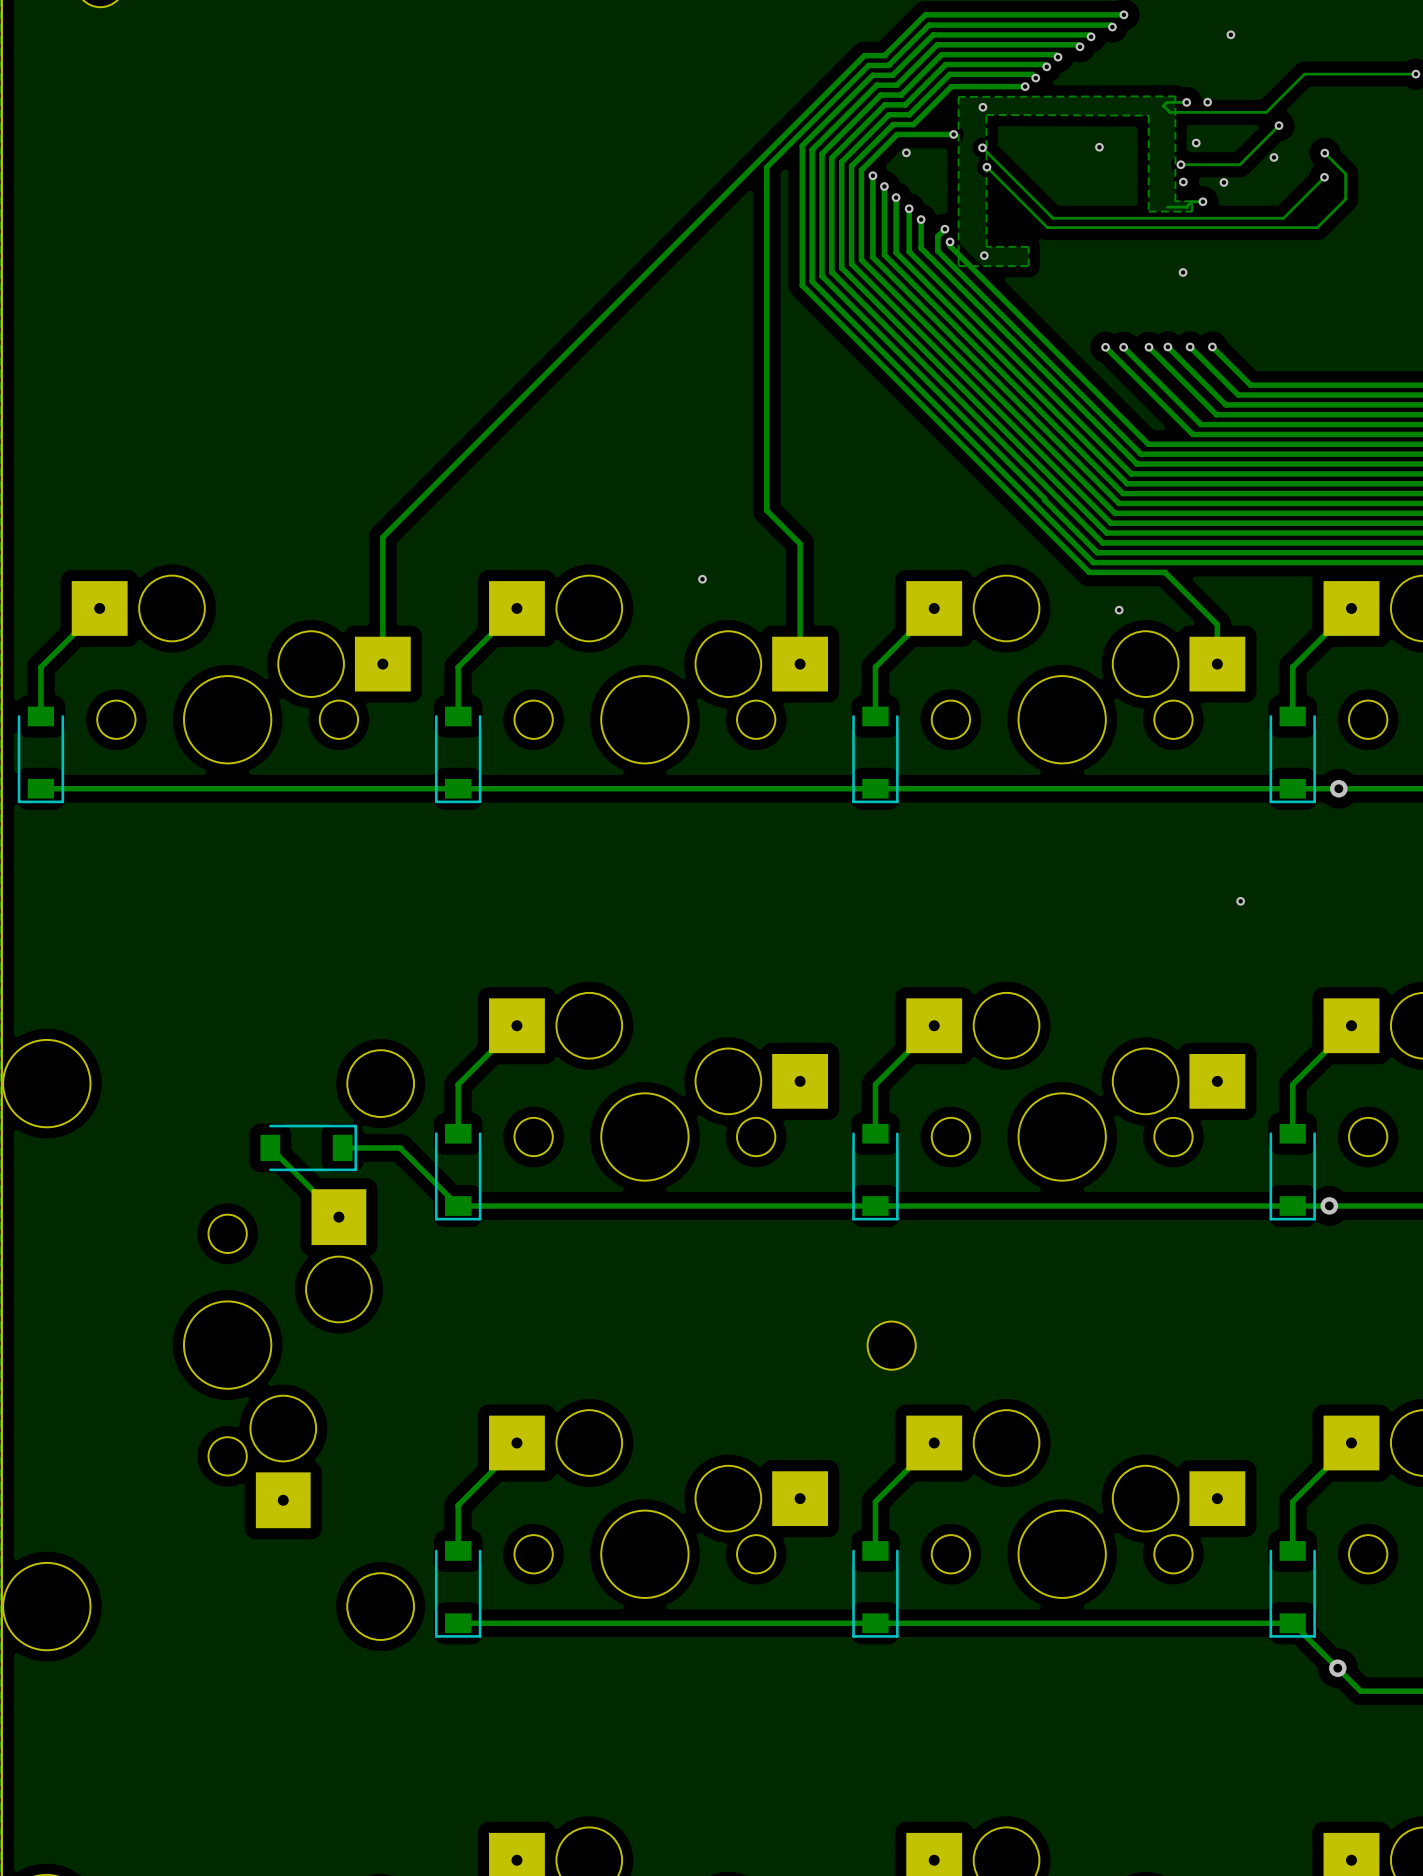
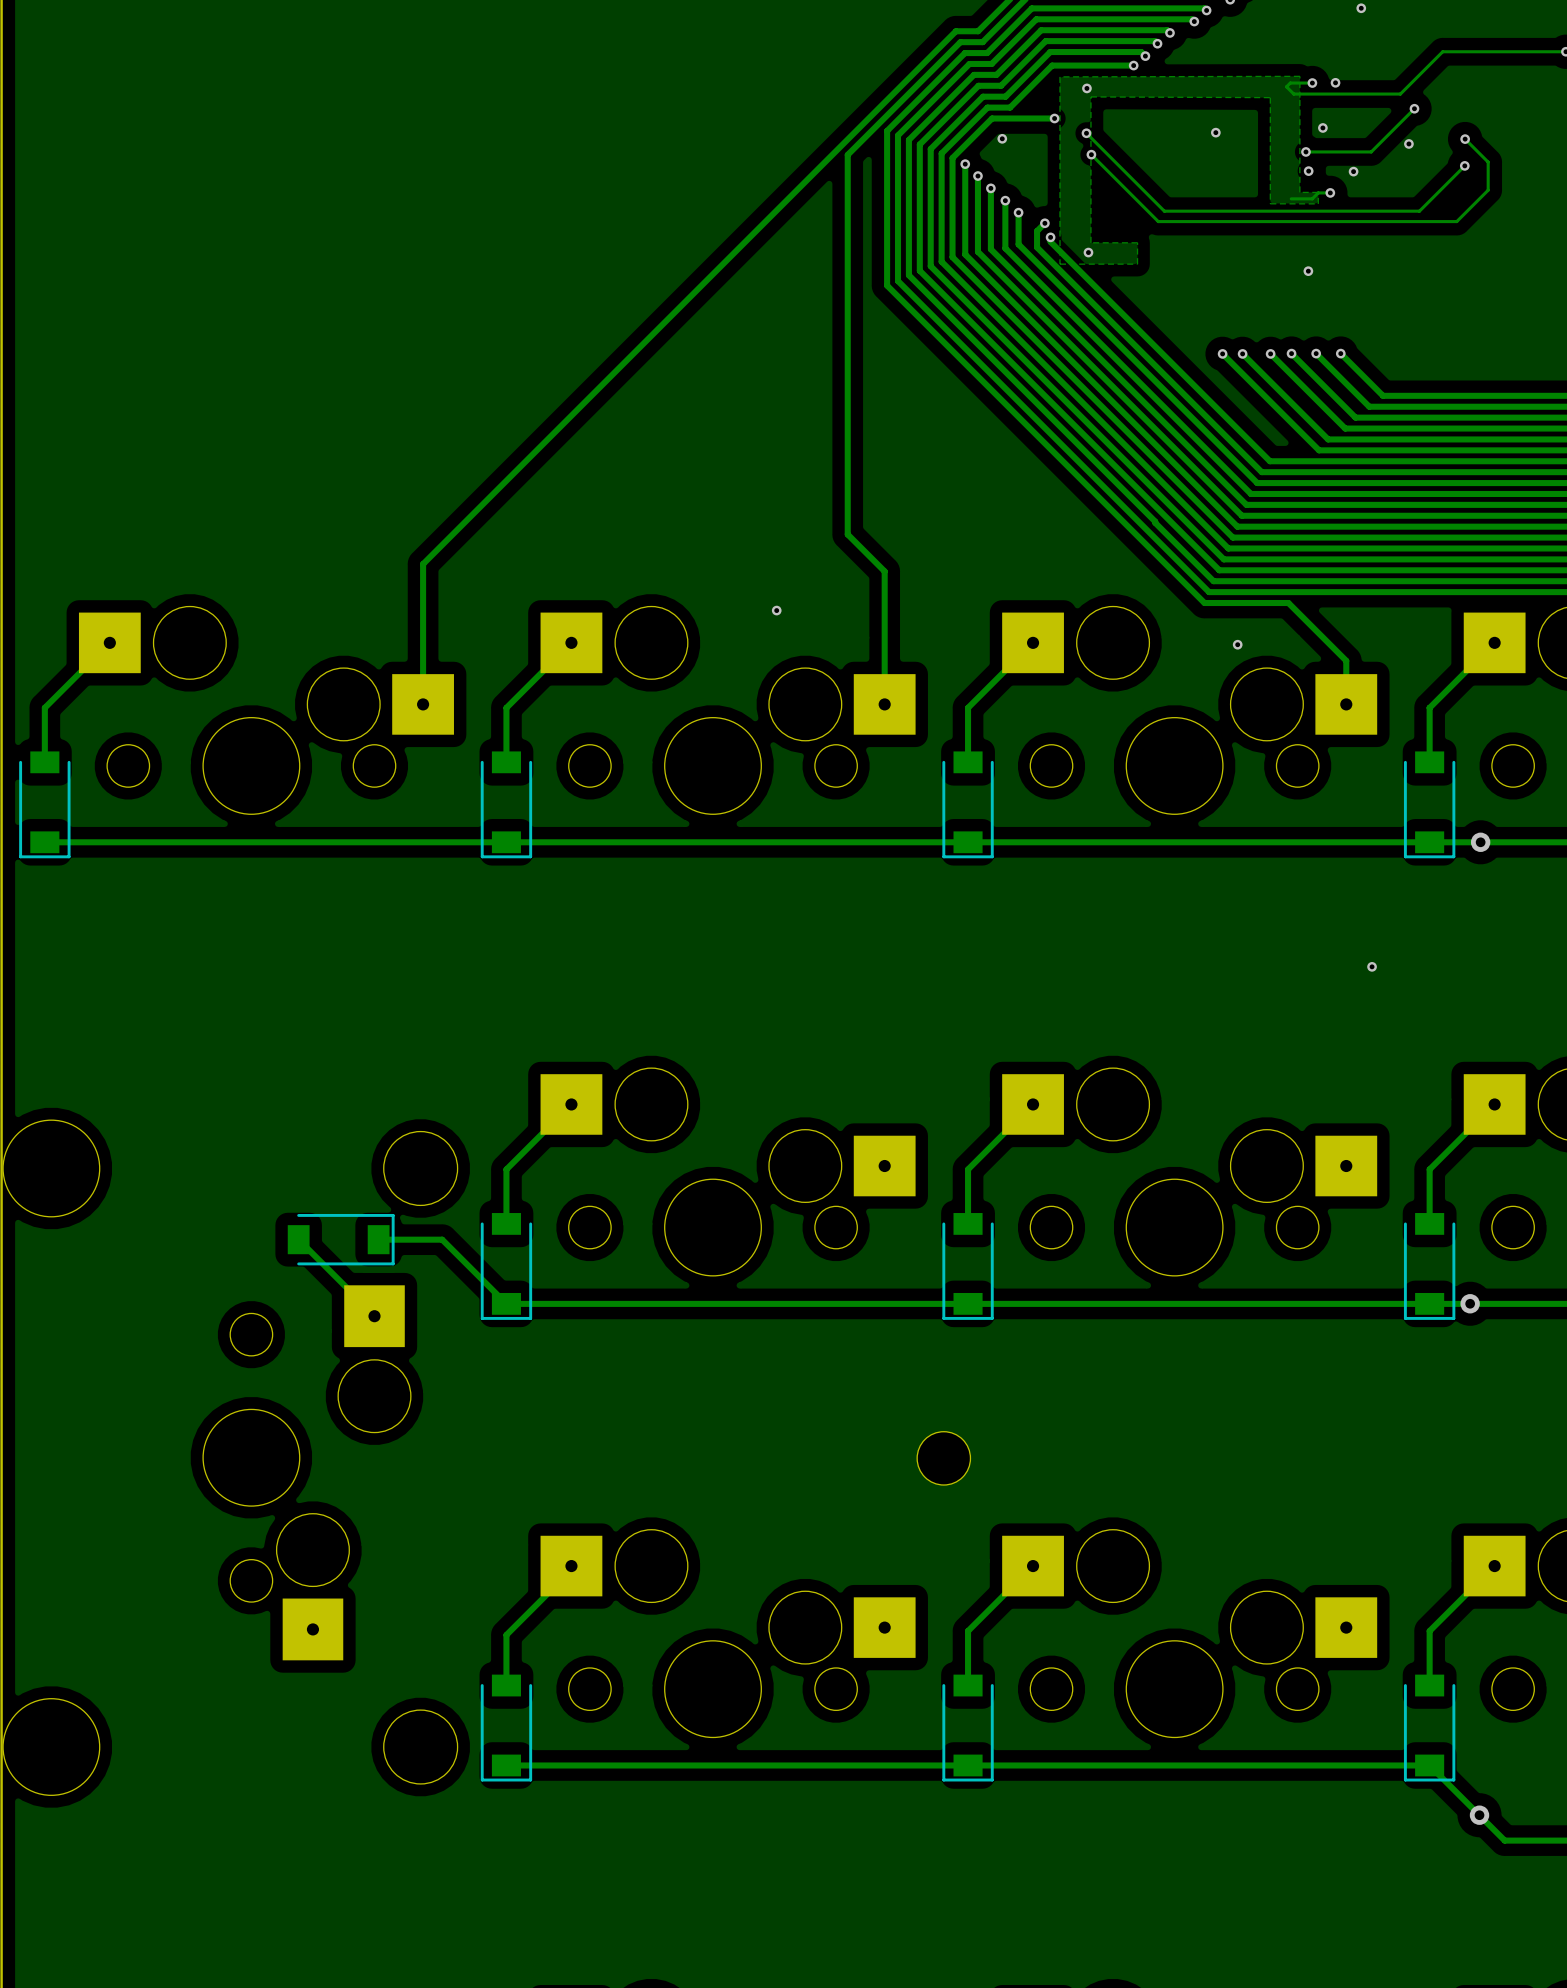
part position: (891, 1345) -> (943, 1458)

